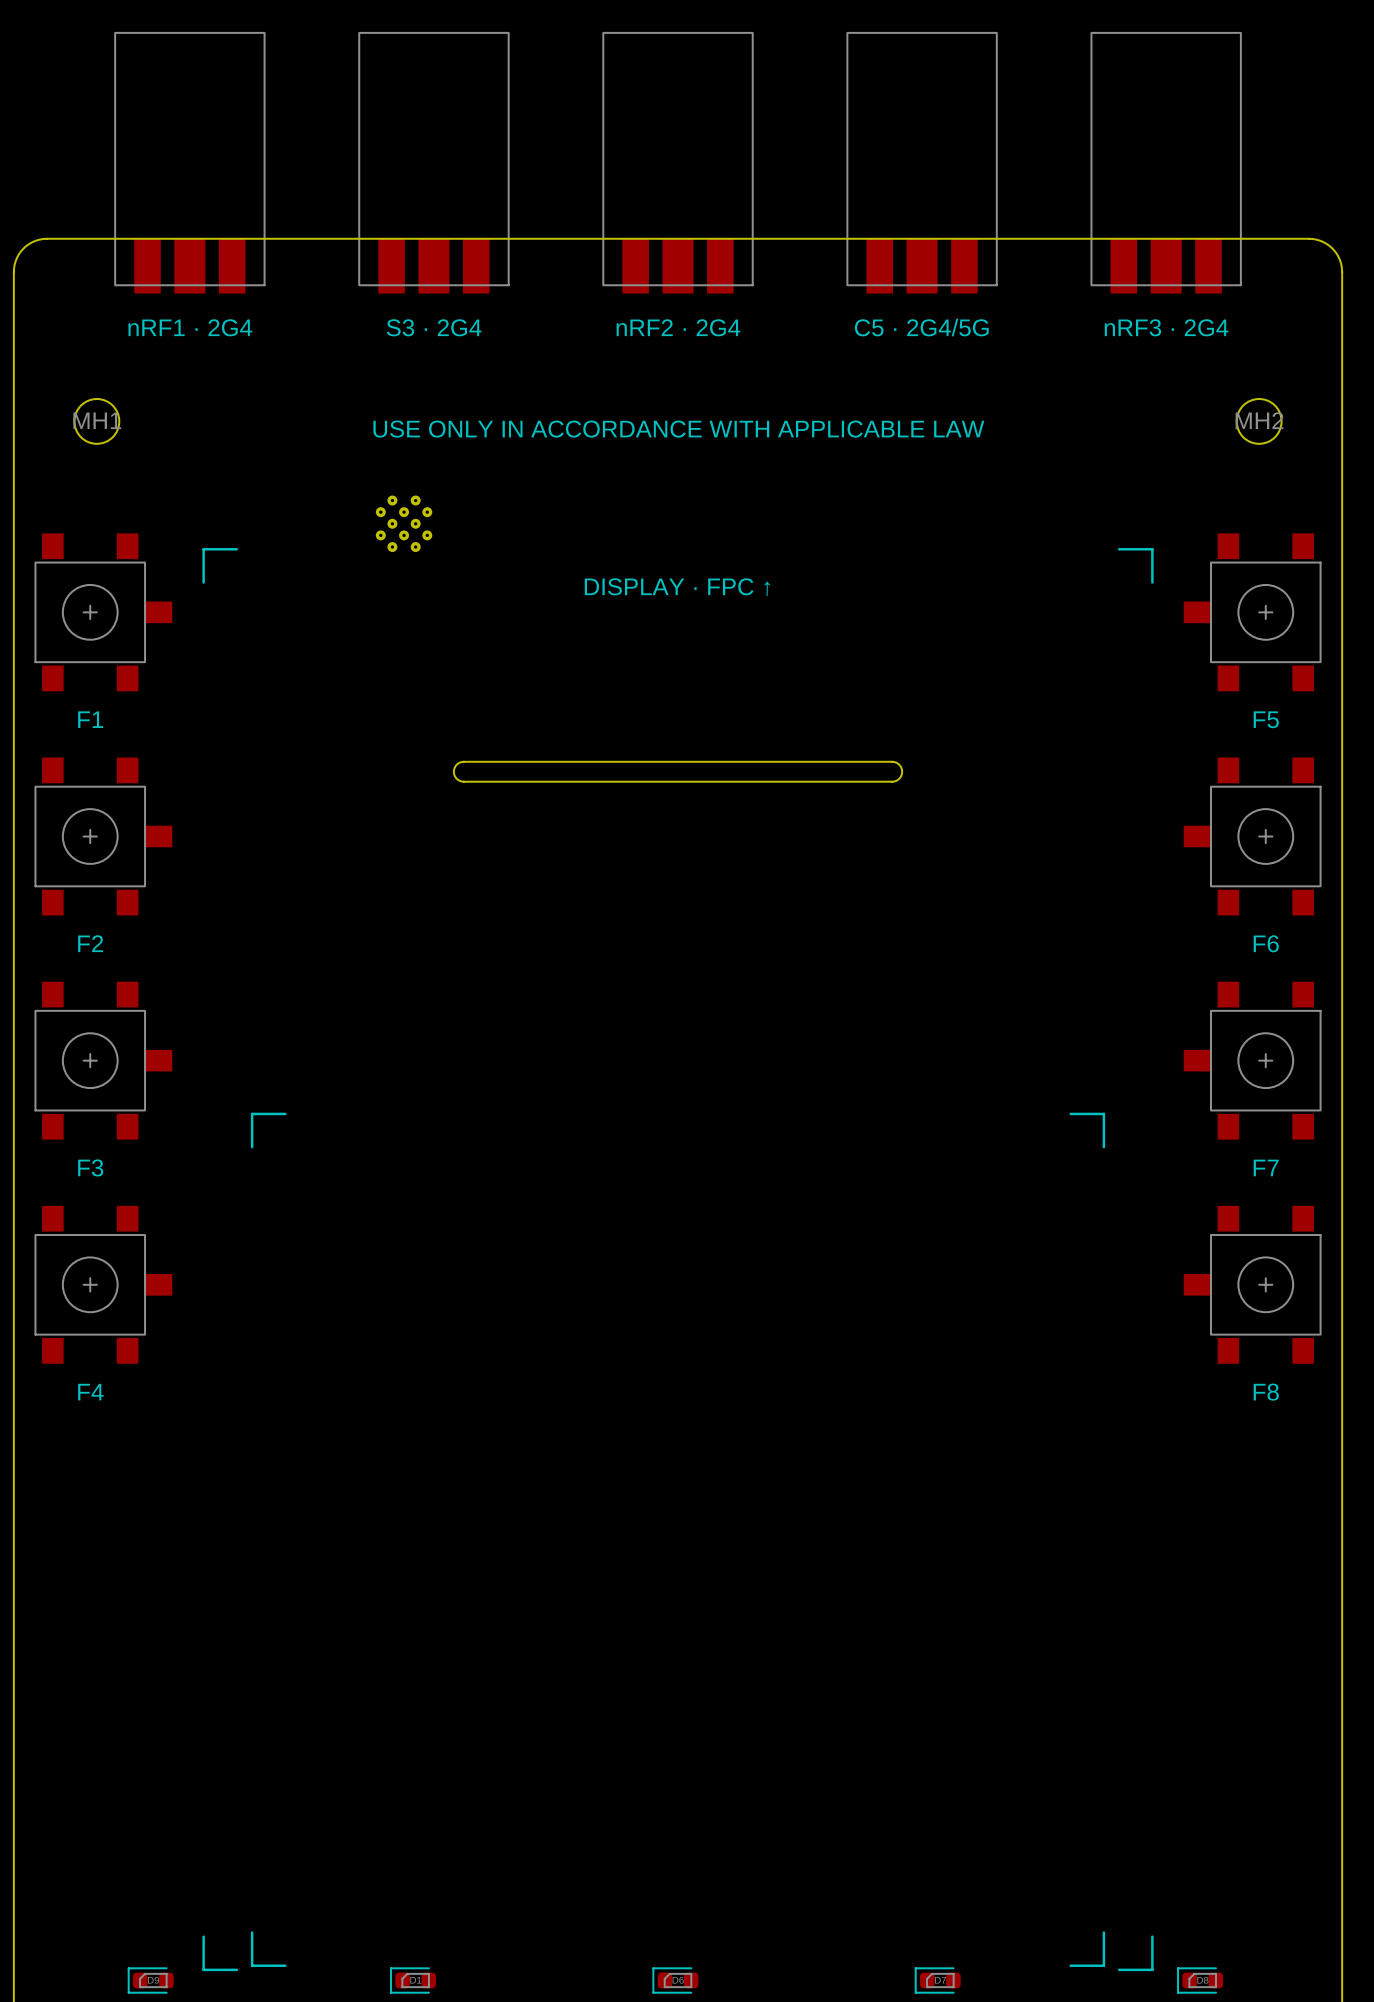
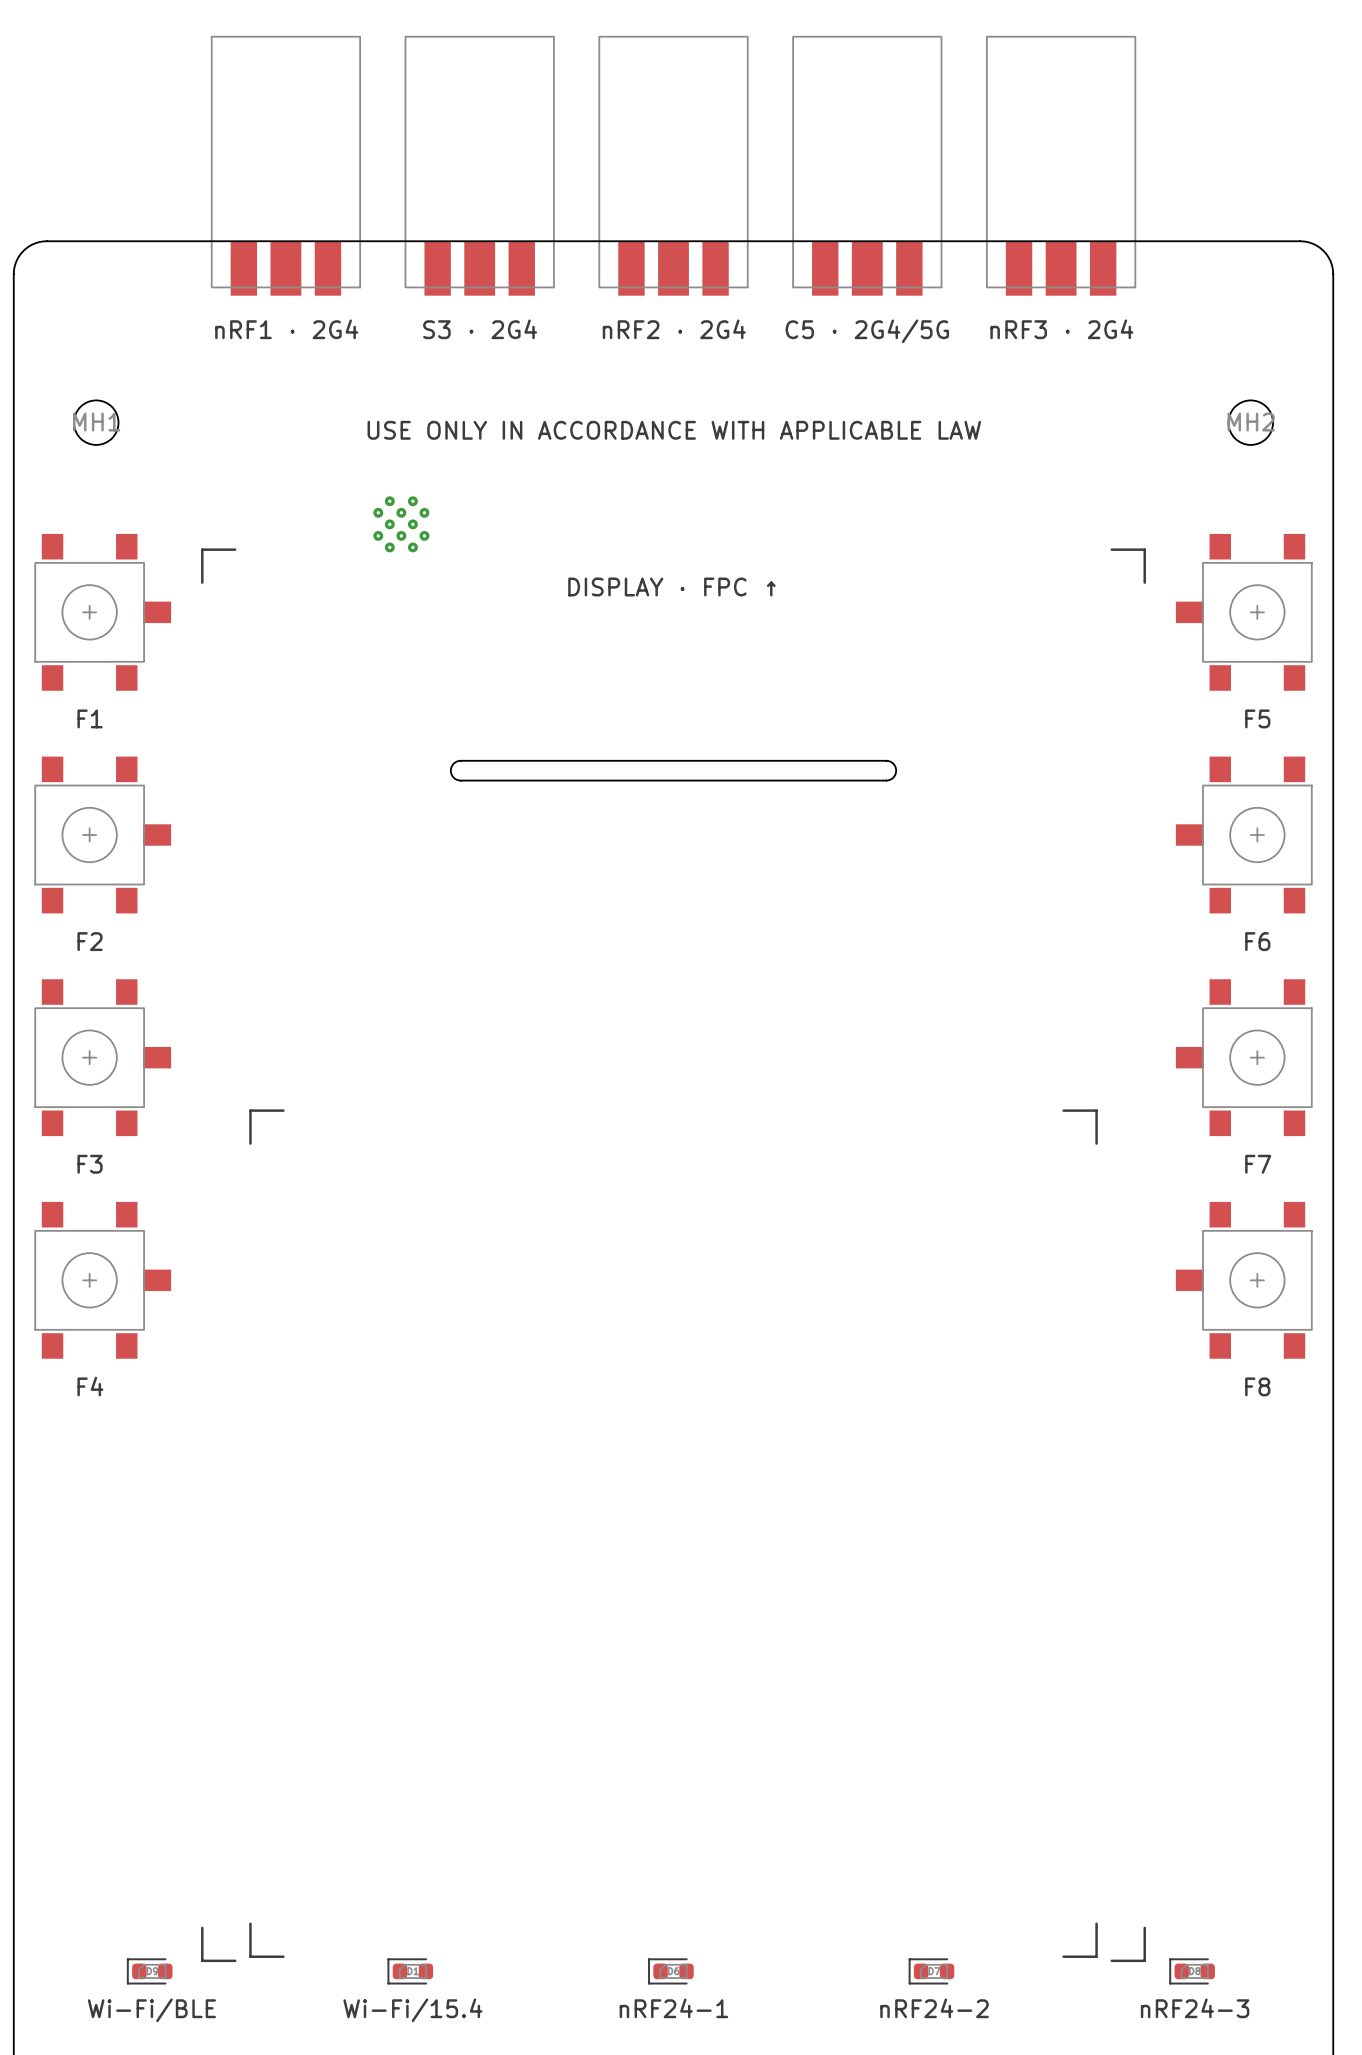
part: (189, 162) -> none
part: none -> (285, 165)
part position: (433, 162) -> (479, 165)
part position: (922, 162) -> (867, 165)
part: none -> (1061, 165)
part: (1166, 162) -> none
text position: nRF1 · 2G4 (190, 327) -> nRF1 · 2G4 (286, 329)
text position: S3 · 2G4 (434, 327) -> S3 · 2G4 (480, 329)
text position: C5 · 2G4/5G (921, 327) -> C5 · 2G4/5G (867, 331)
text position: nRF3 · 2G4 (1166, 327) -> nRF3 · 2G4 (1061, 329)

